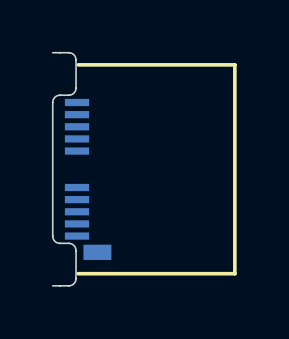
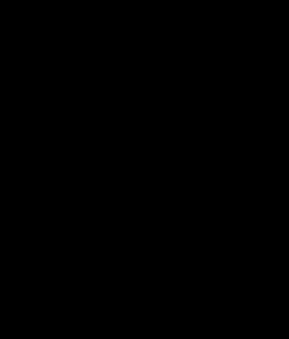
part: (144, 169) -> none

